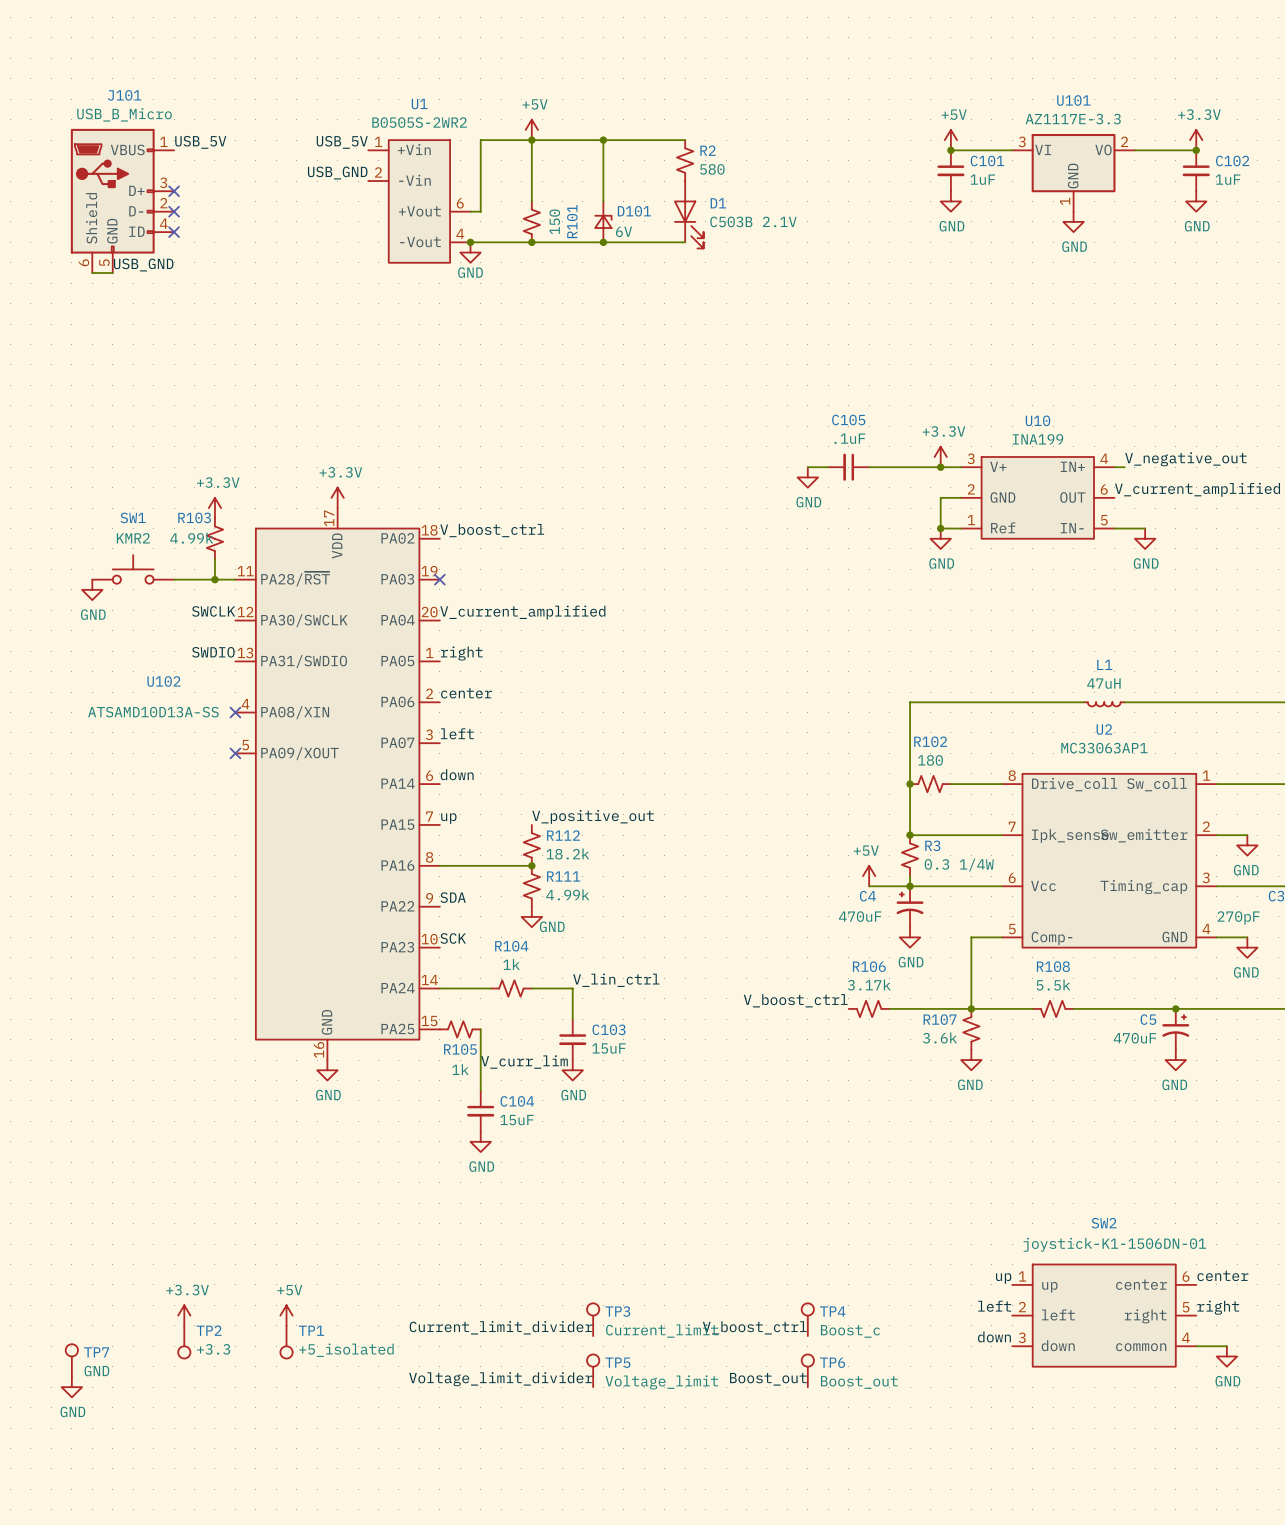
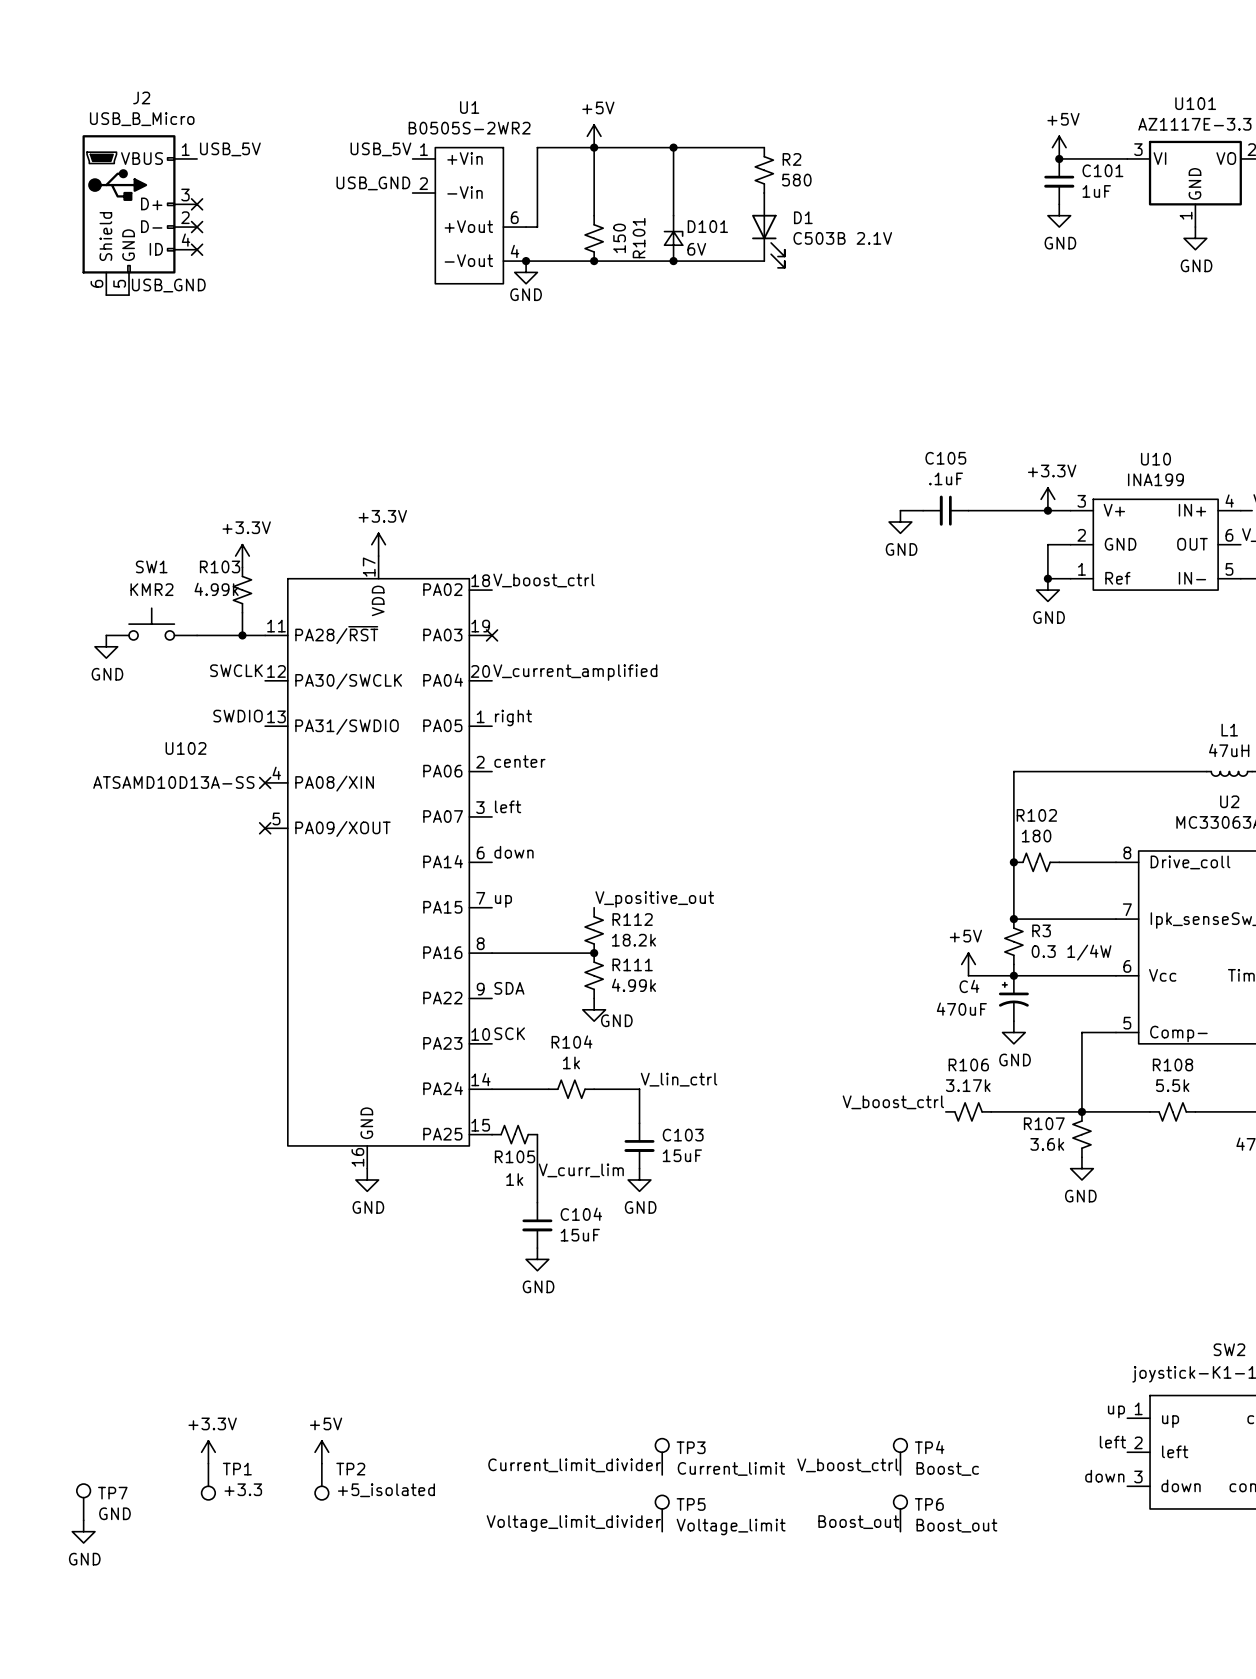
J101 name: J101 (124, 95) -> J2 (141, 97)
TP2 name: TP2 (209, 1330) -> TP1 (237, 1469)
TP1 name: TP1 (311, 1330) -> TP2 (350, 1469)

